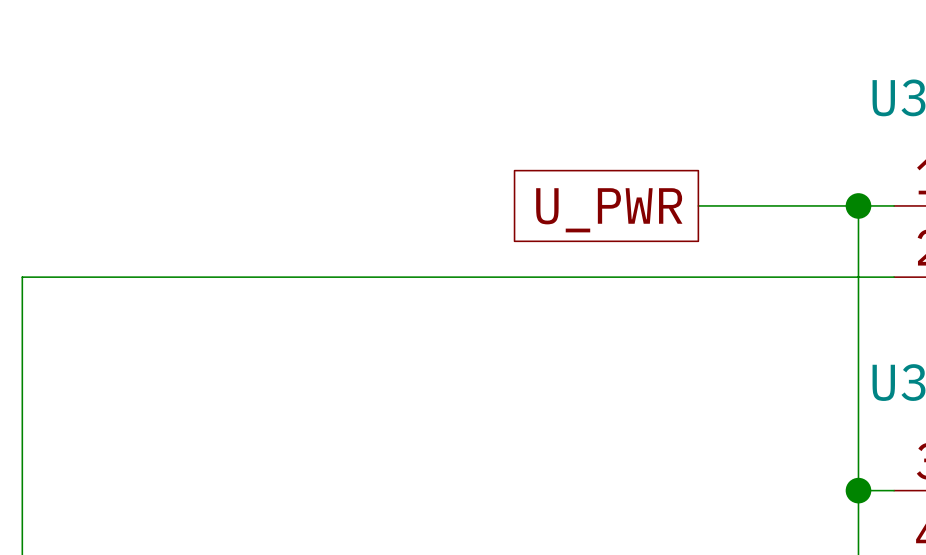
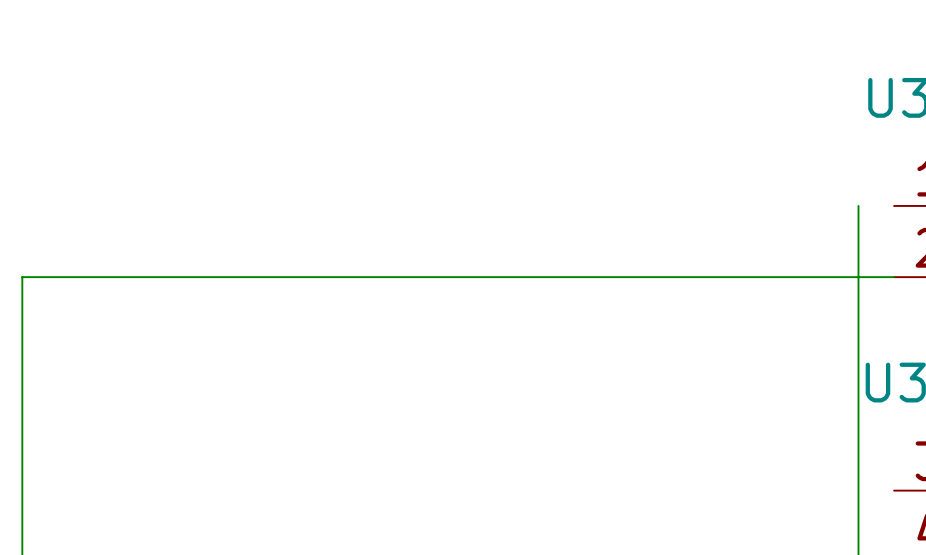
wire: (698, 205) (894, 205) -> none
junction: (858, 205) -> none
global label: U_PWR (609, 210) -> none
wire: (858, 490) (894, 490) -> none
junction: (858, 490) -> none

